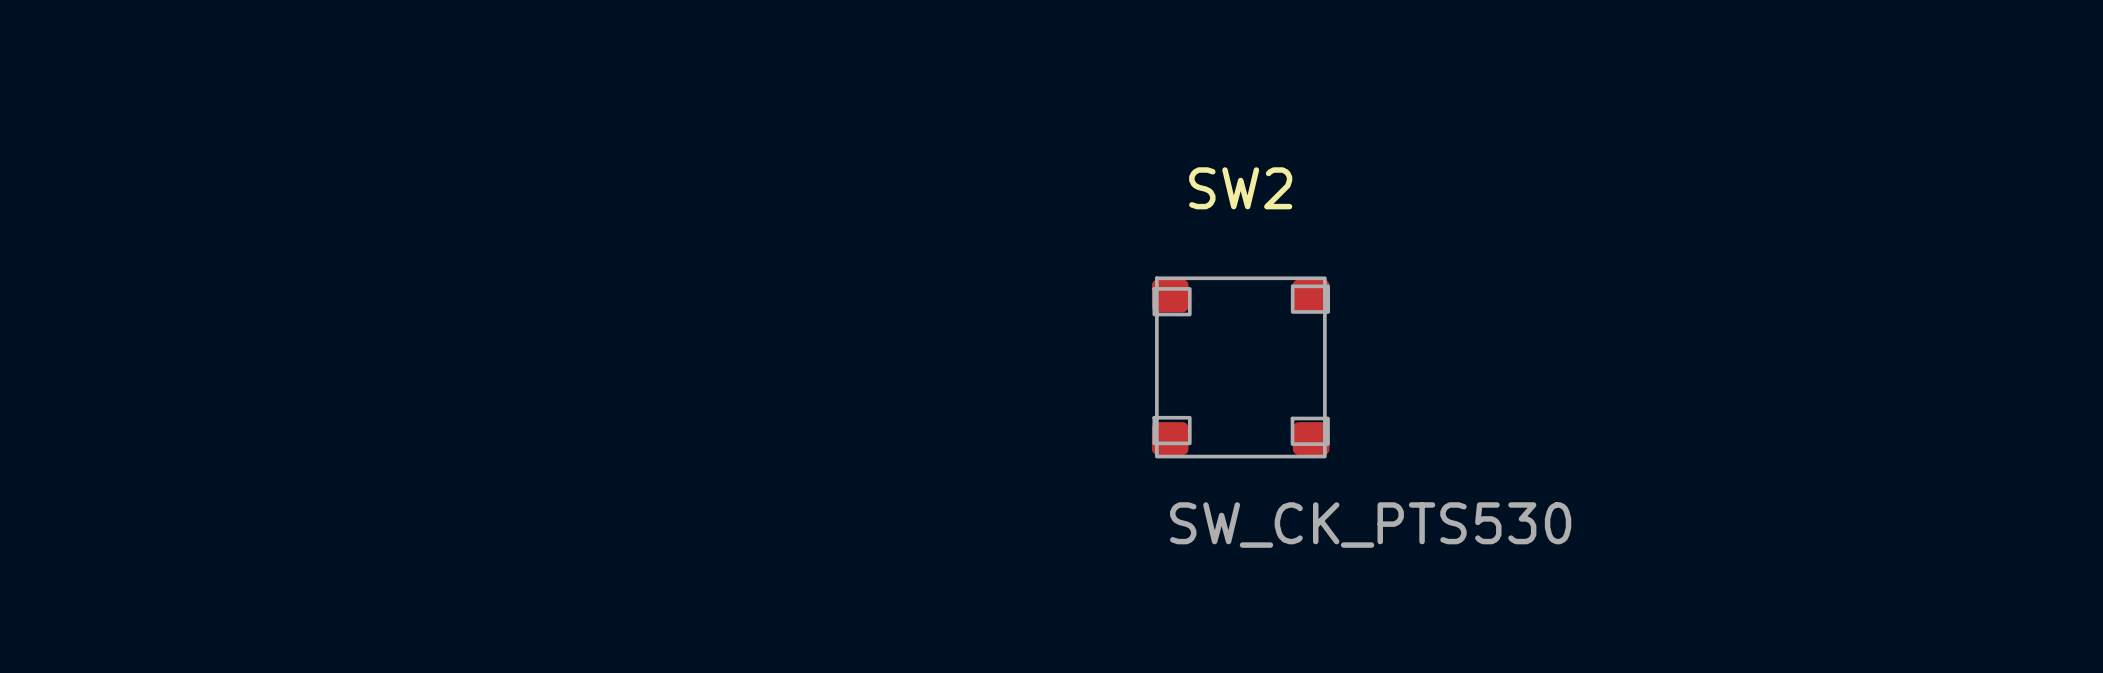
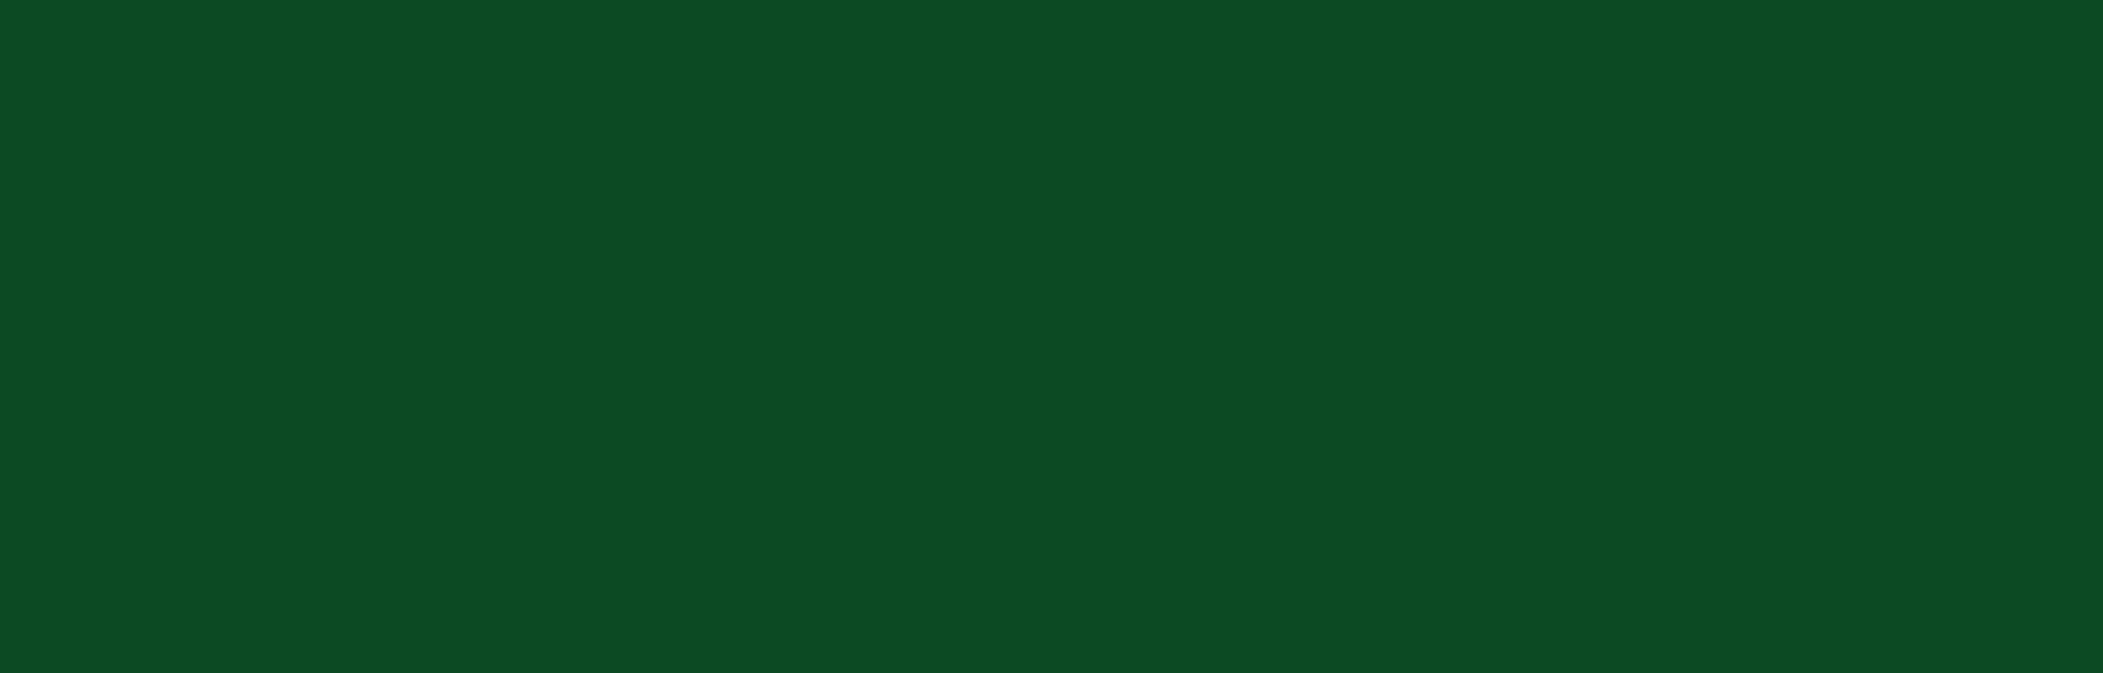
SW2: SW_CK_PTS530 (1240, 367) -> none

